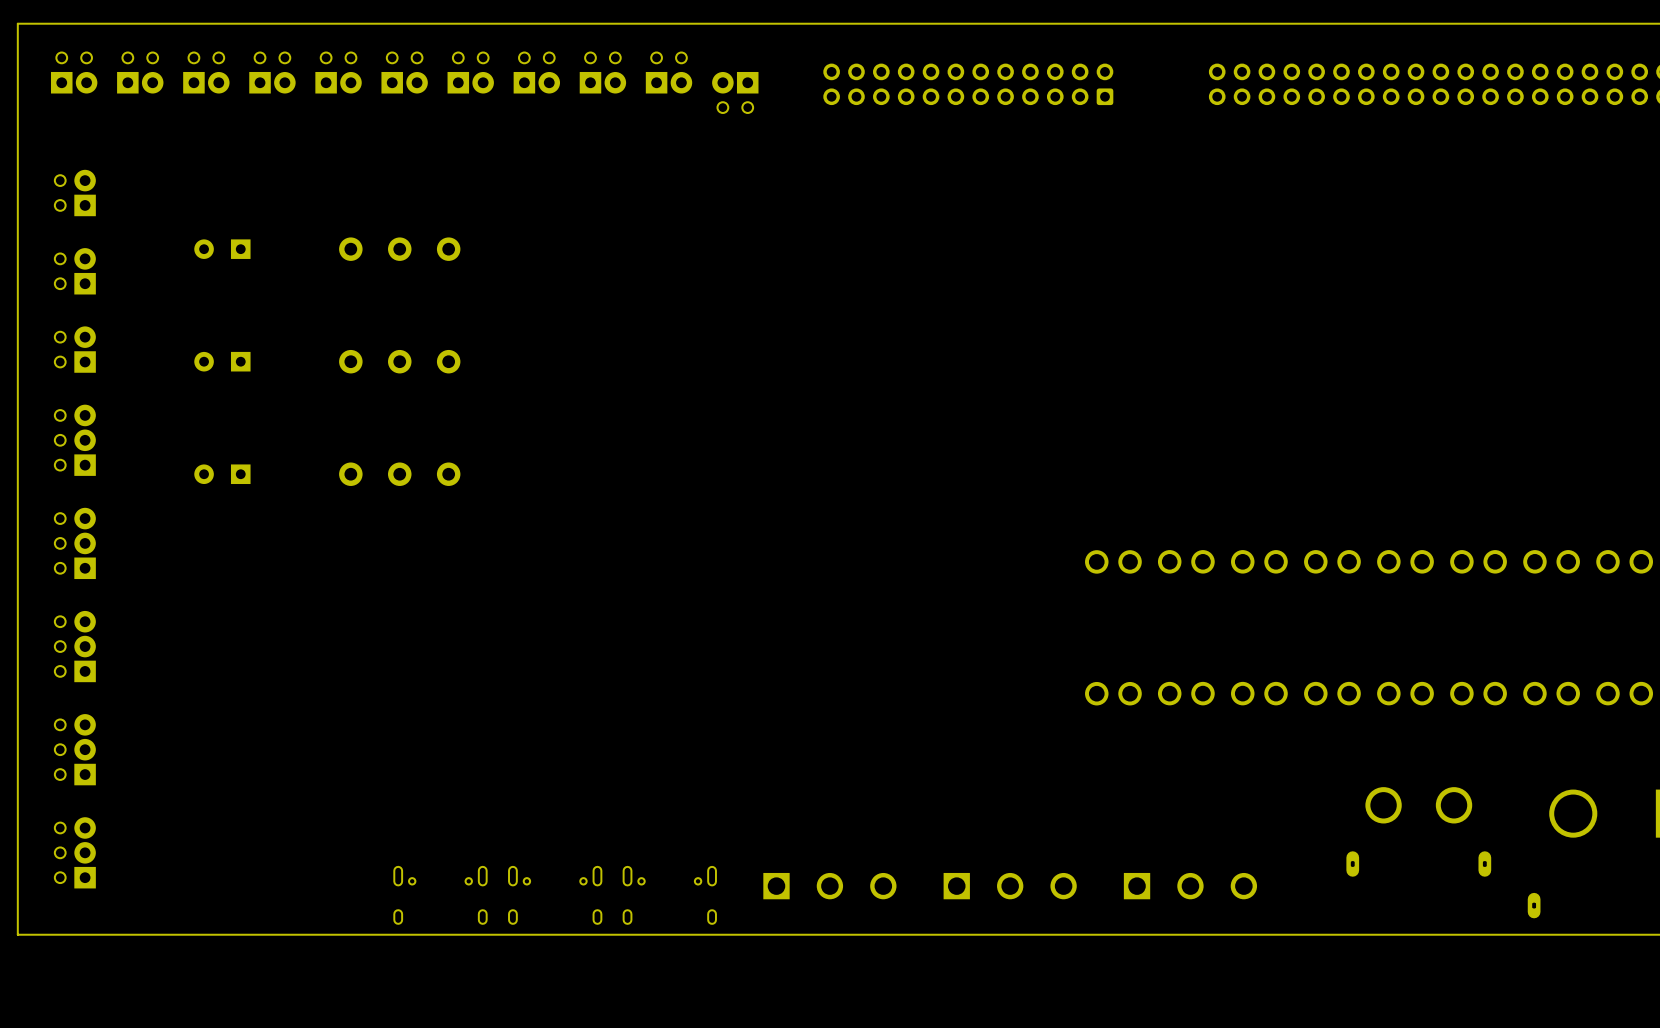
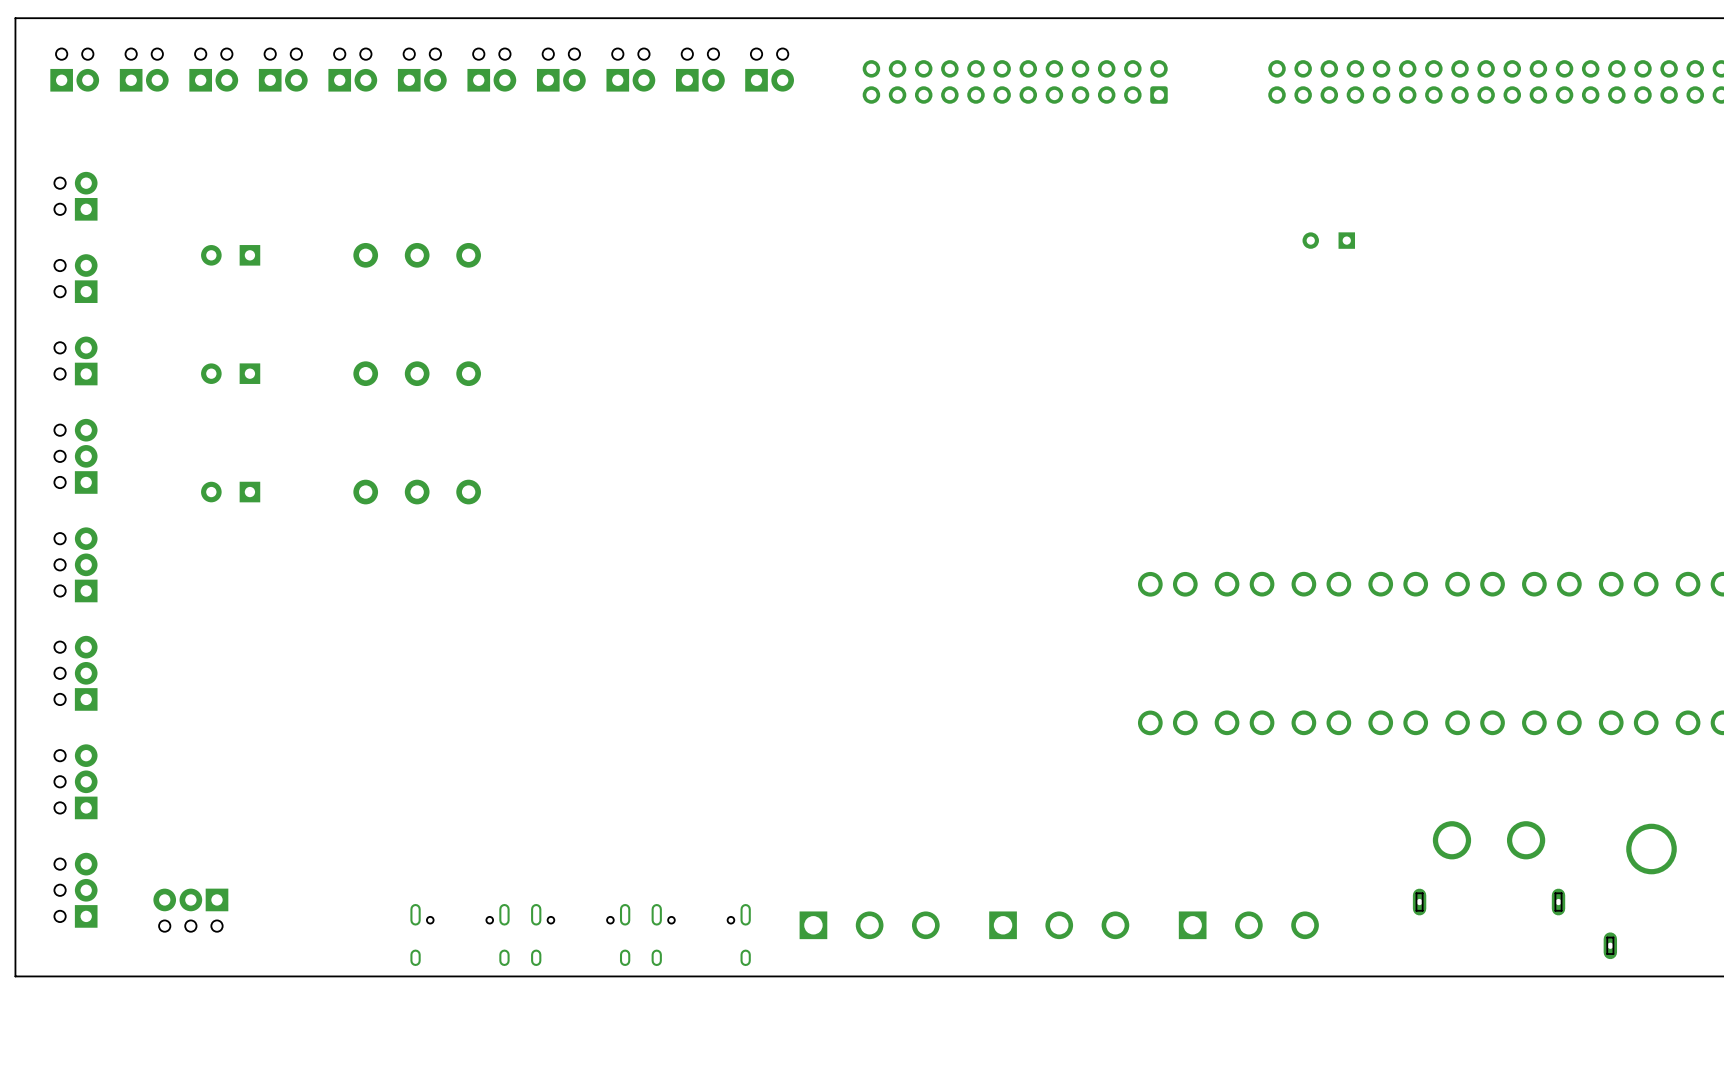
part rotation: 0° (735, 92) -> 180° (769, 70)
part: none -> (1328, 240)
part: none -> (190, 910)

